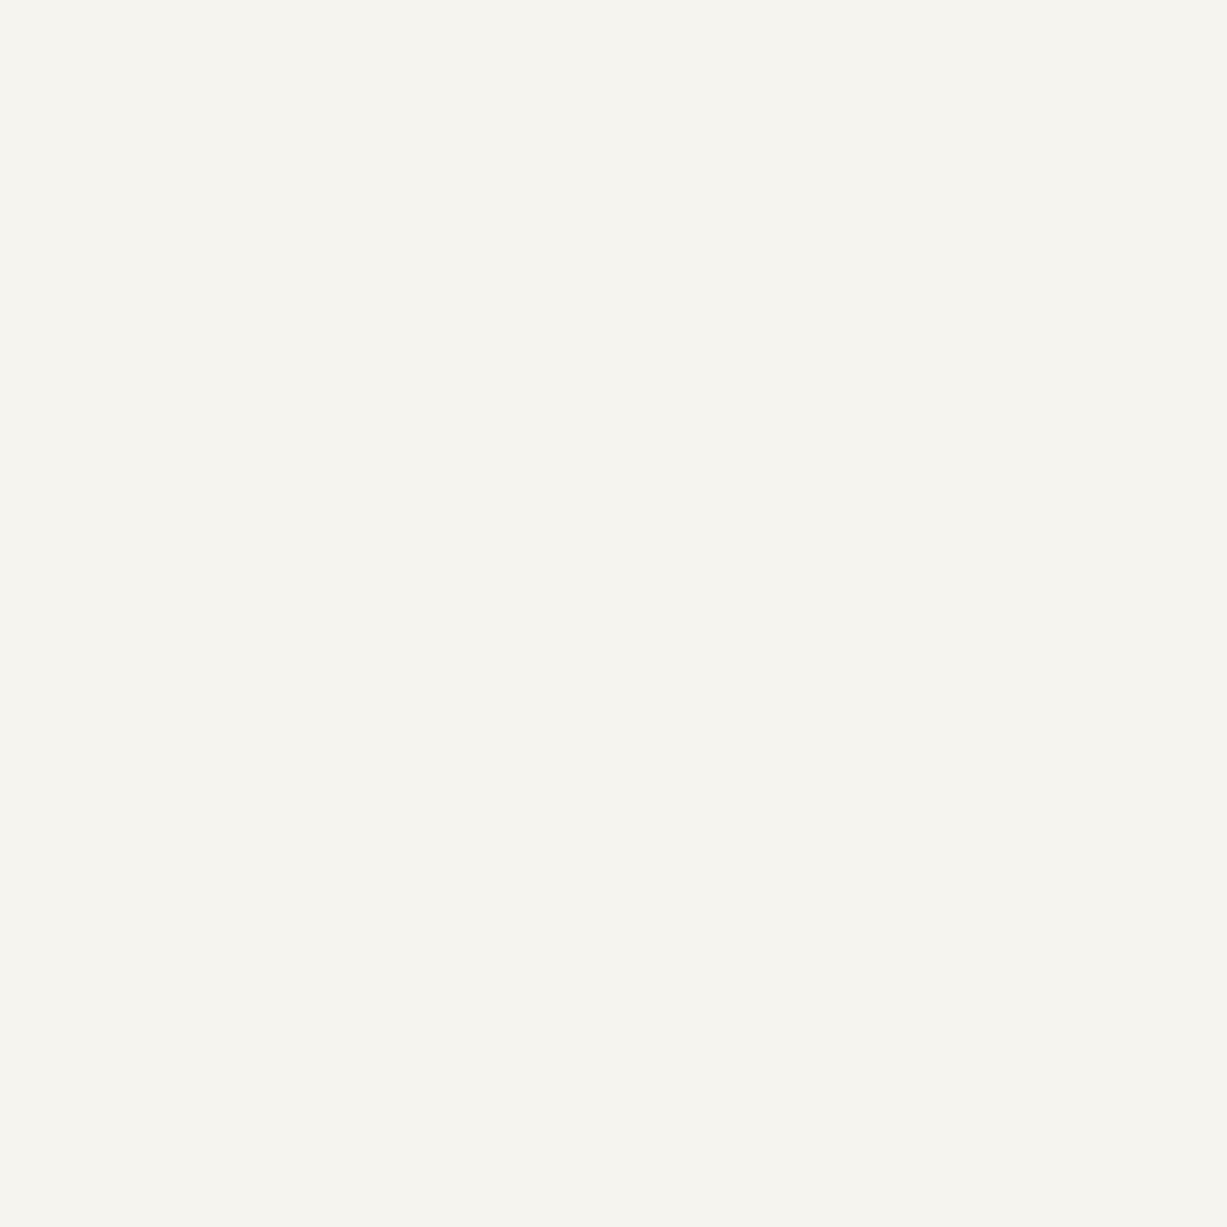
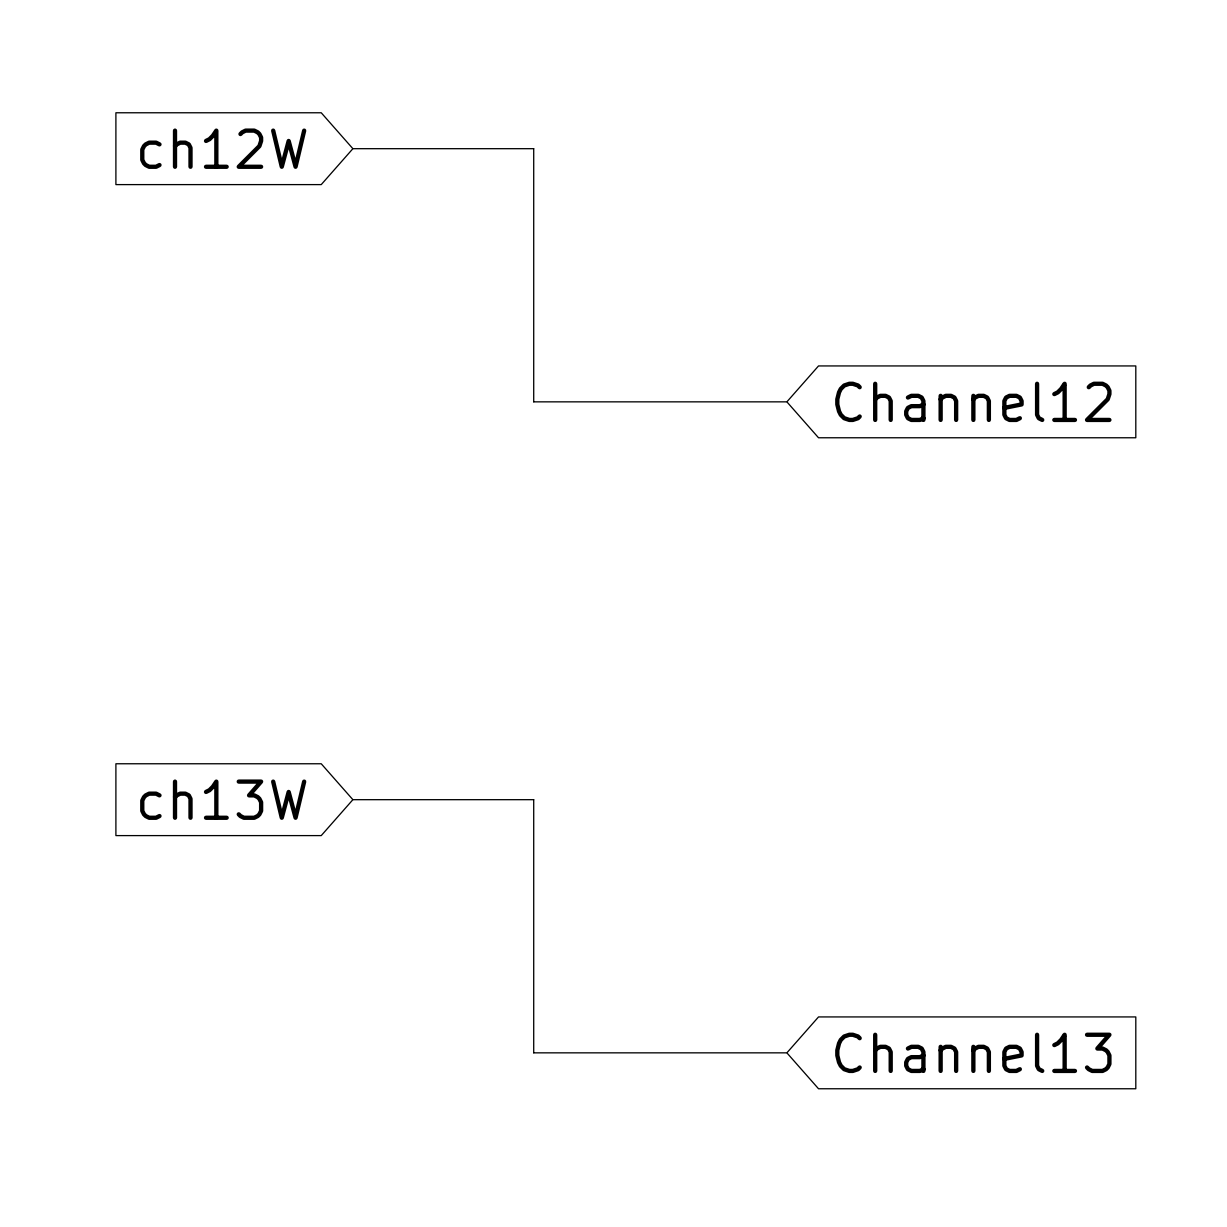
global label: none -> ch12W (223, 148)
wire: none -> (352, 148) (533, 148) (533, 401) (786, 401)
global label: none -> Channel12 (973, 401)
global label: none -> ch13W (223, 799)
wire: none -> (352, 799) (533, 799) (533, 1052) (786, 1052)
global label: none -> Channel13 (973, 1052)

